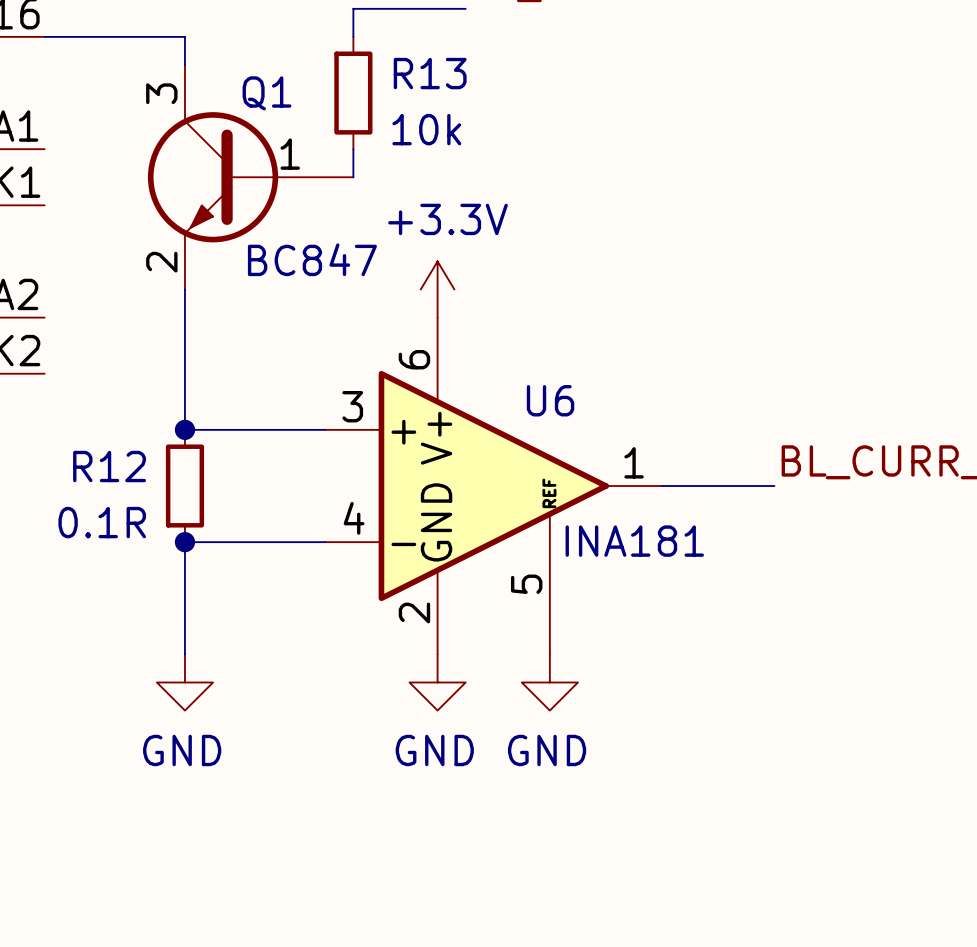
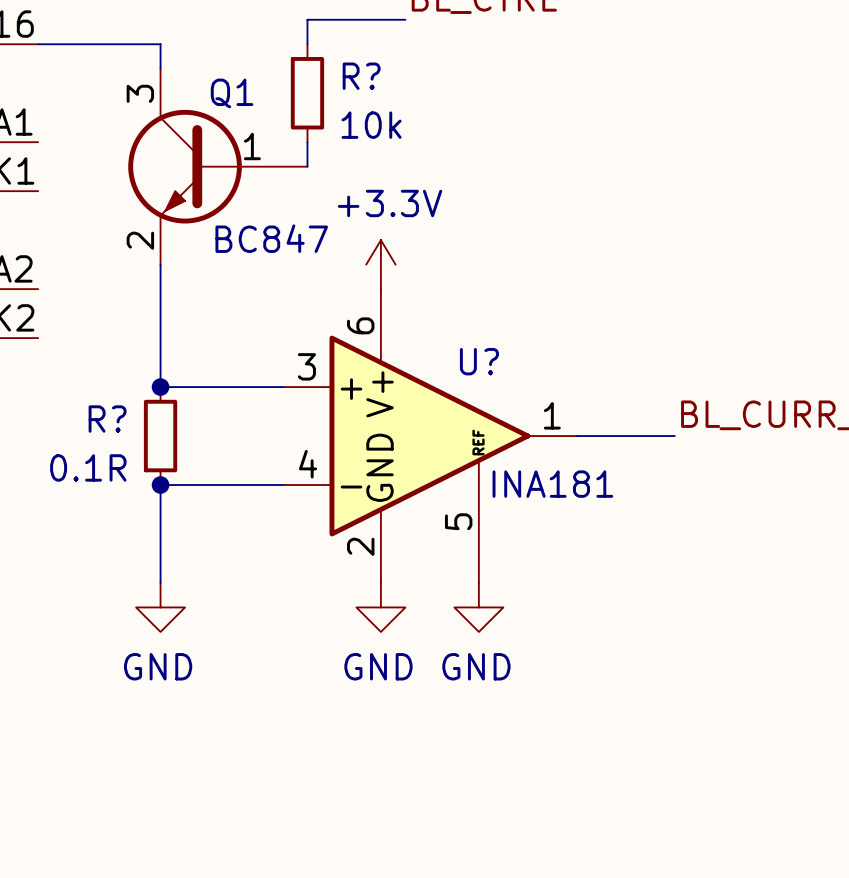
R13 name: R13 (430, 73) -> R? (361, 76)
U6 name: U6 (550, 400) -> U? (479, 361)
R12 name: R12 (109, 466) -> R? (107, 419)

